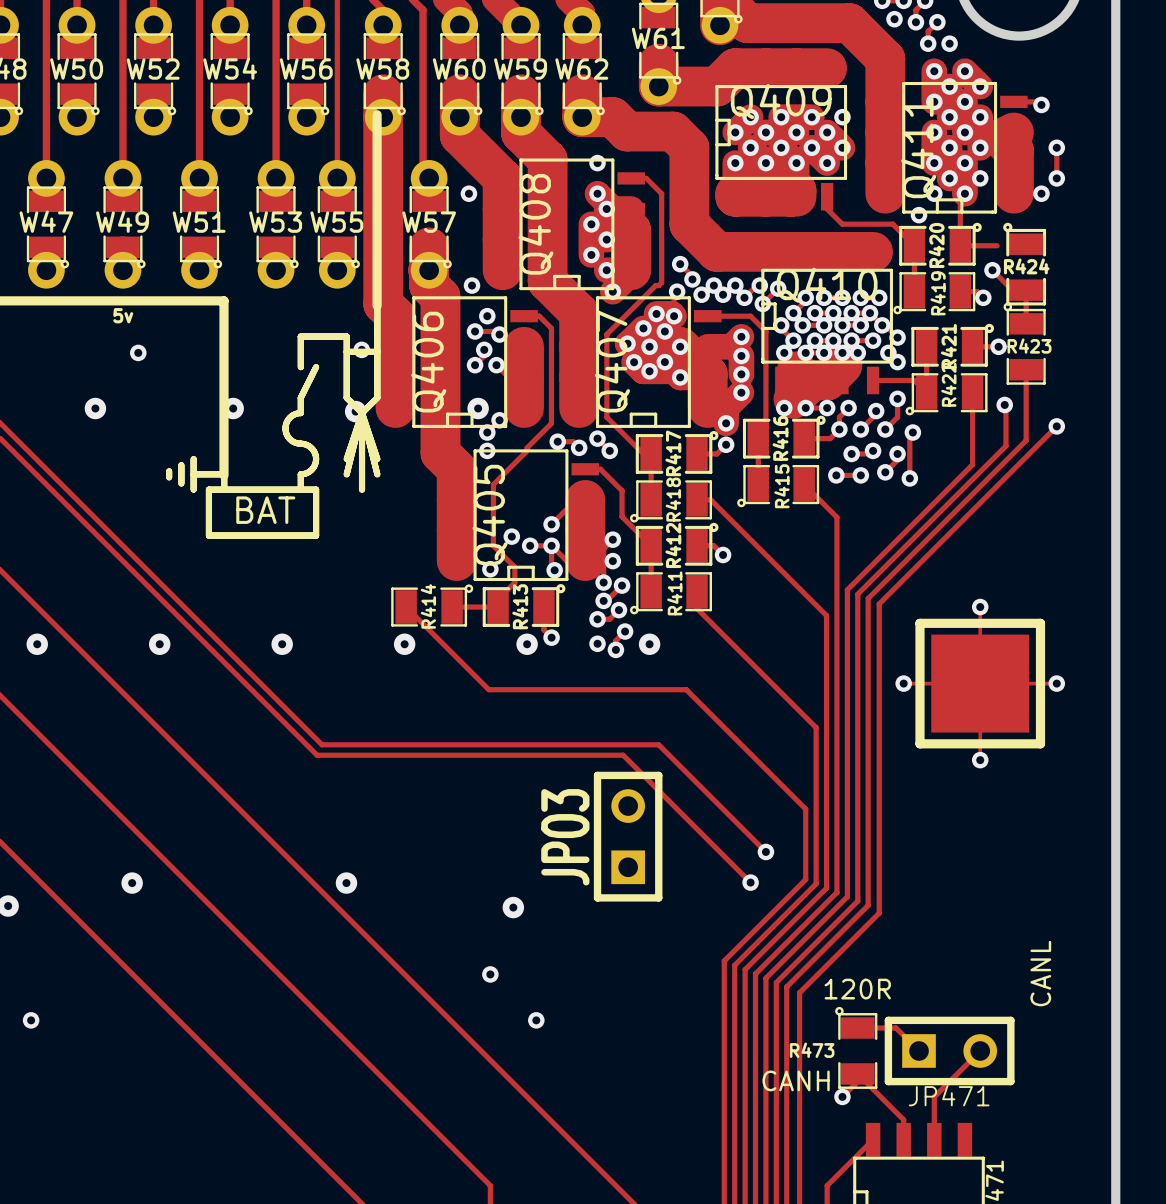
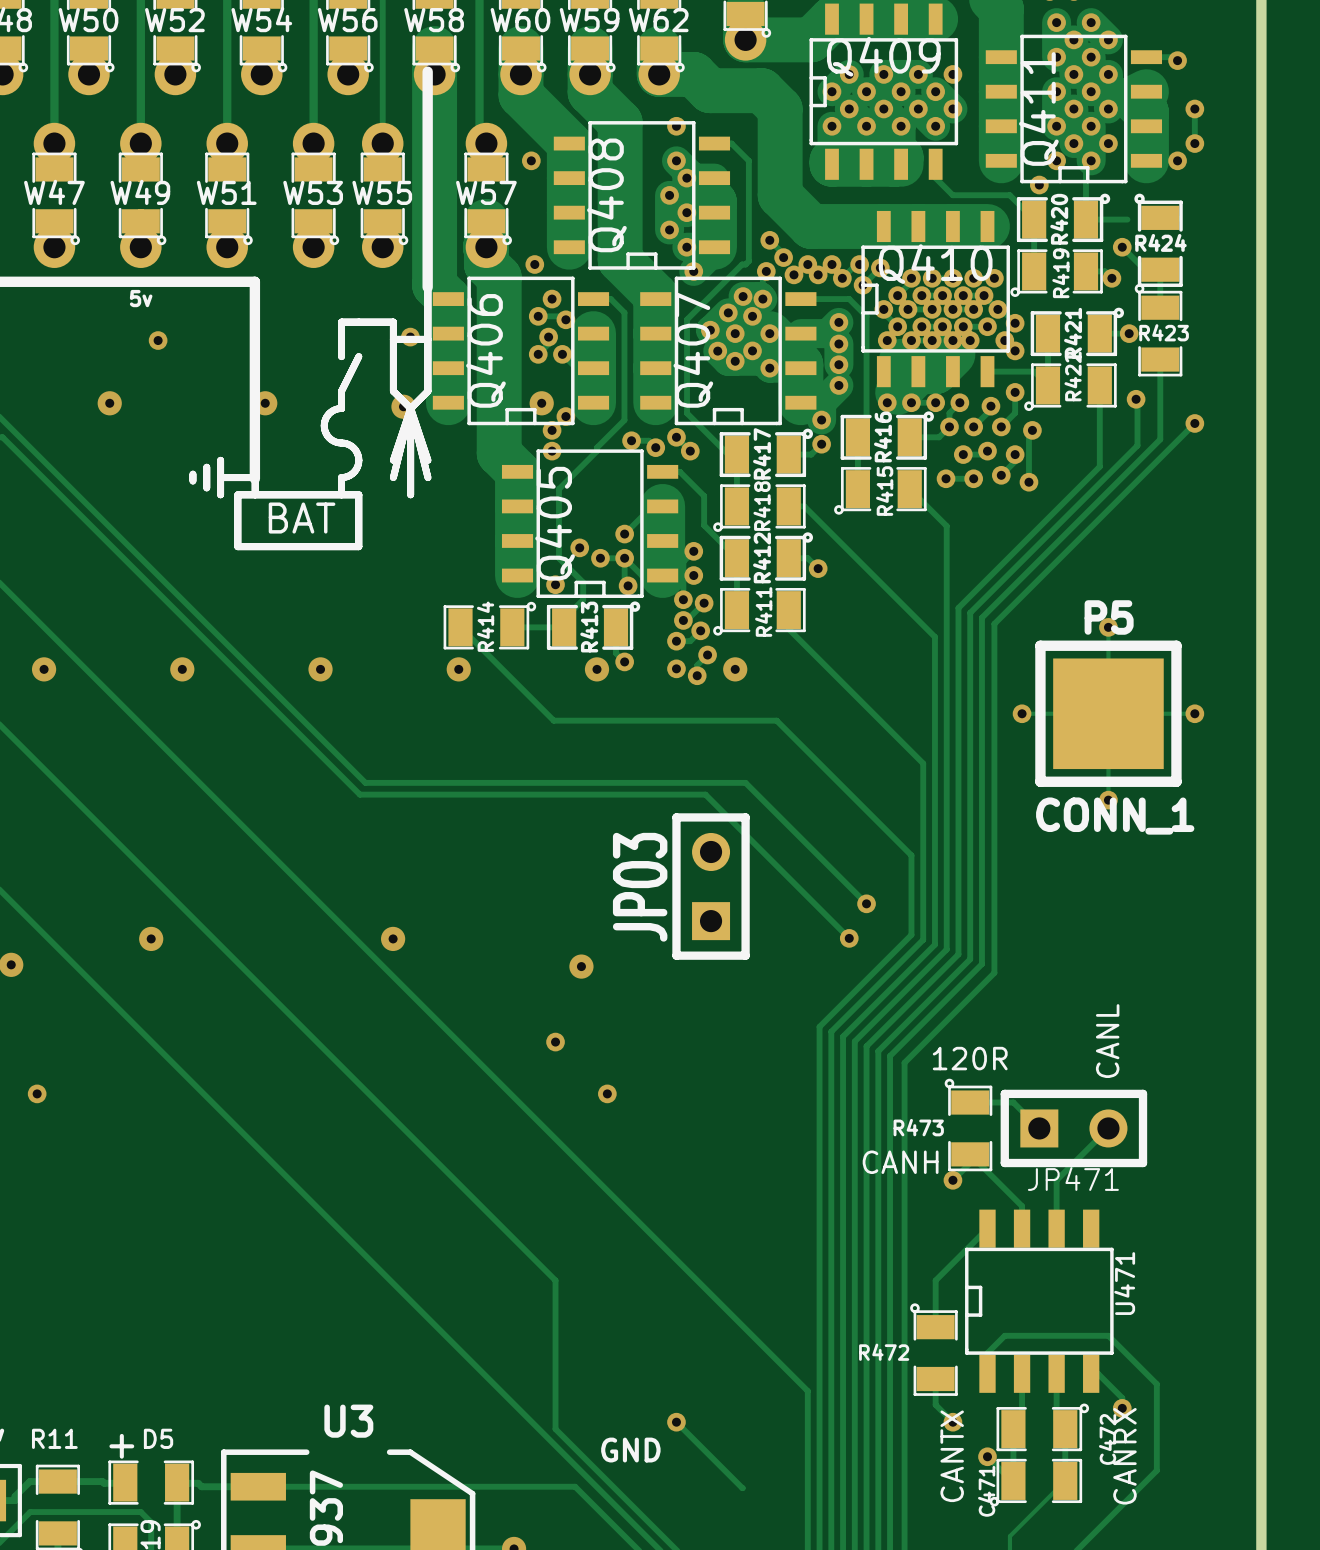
P5 name: none -> P5 (1109, 617)
P5 value: none -> CONN_1 (1115, 816)
text position: CANL (1040, 973) -> CANL (1107, 1041)

